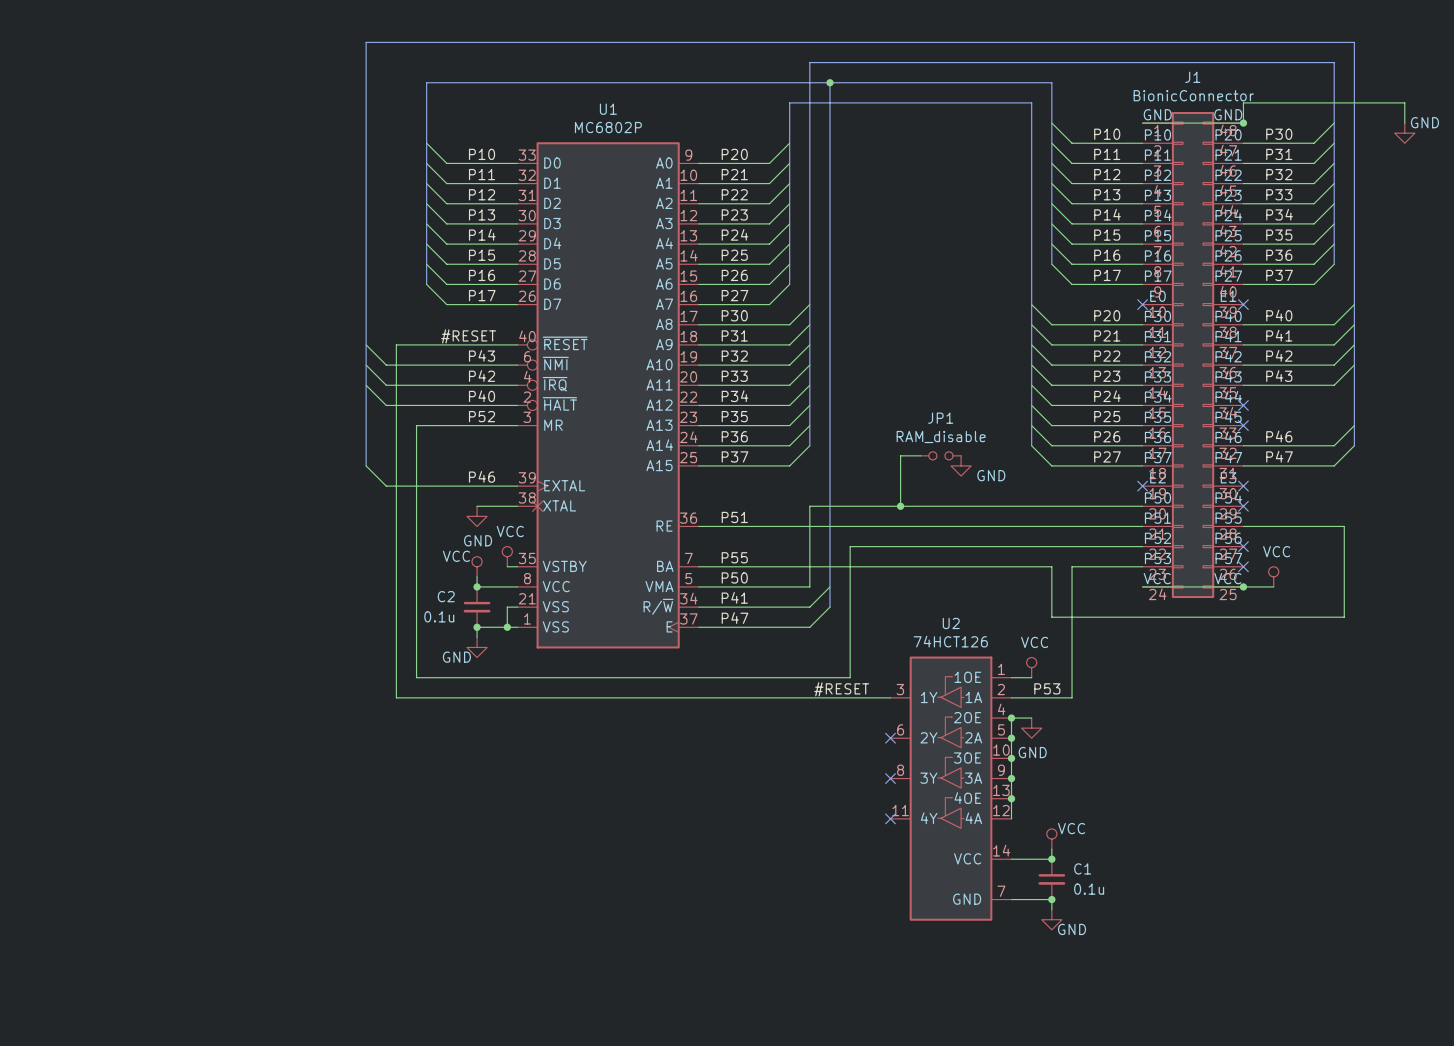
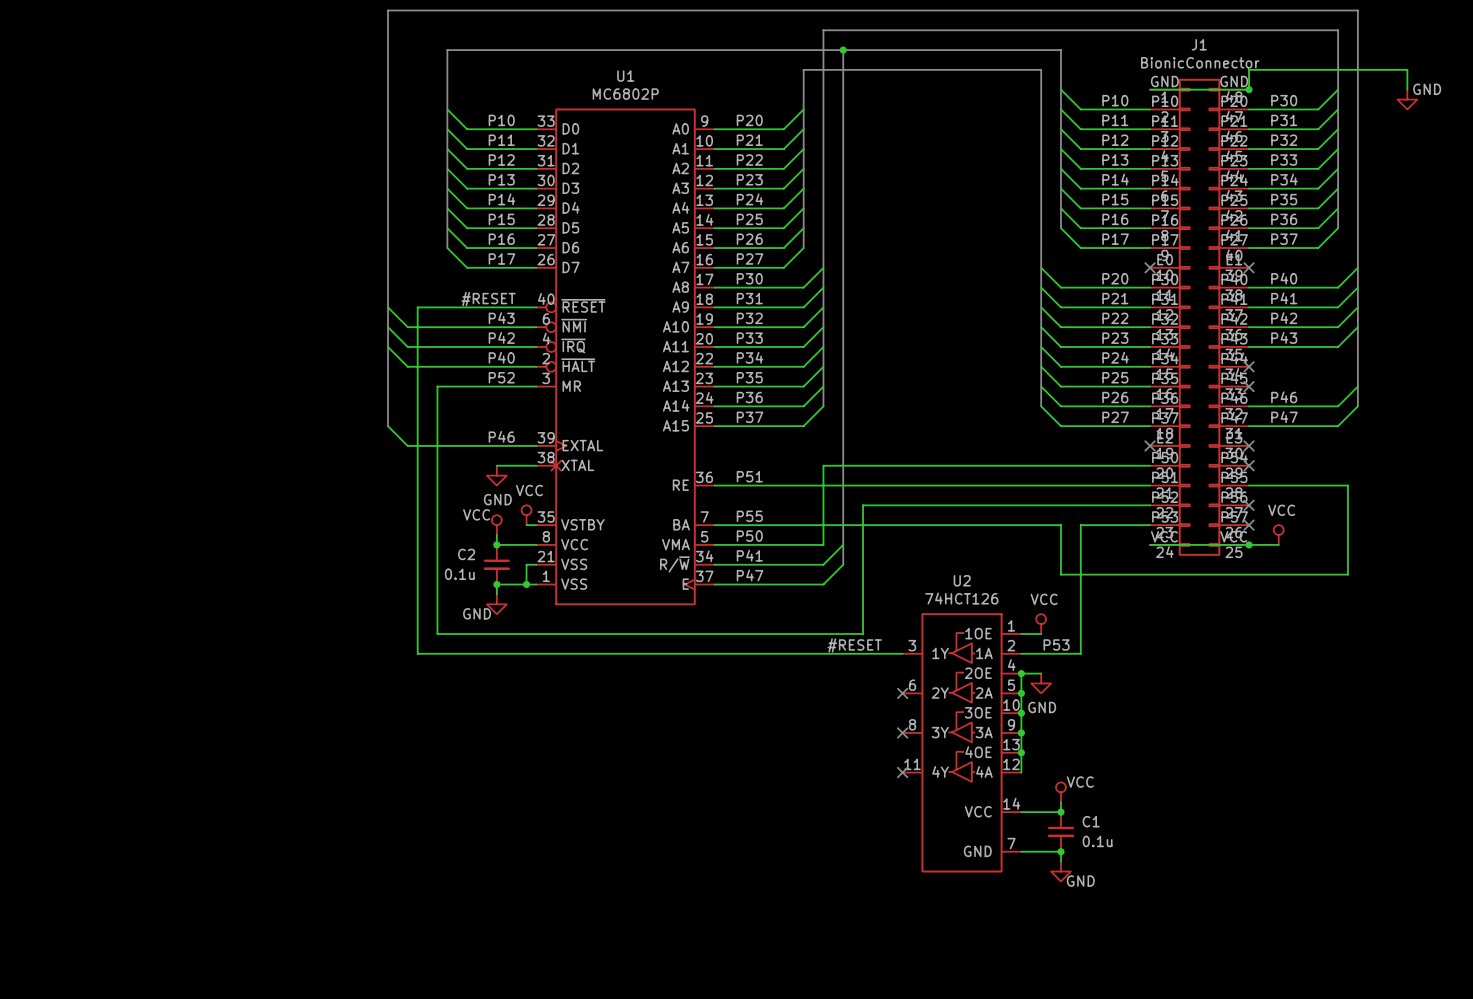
wire: (920, 455) (900, 455) (900, 506) -> none
JP1: RAM_disable (940, 455) -> none
power symbol: GND (961, 465) -> none
junction: (900, 506) -> none

